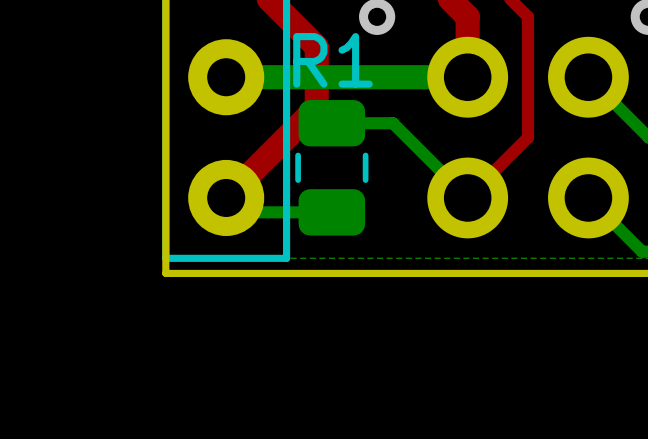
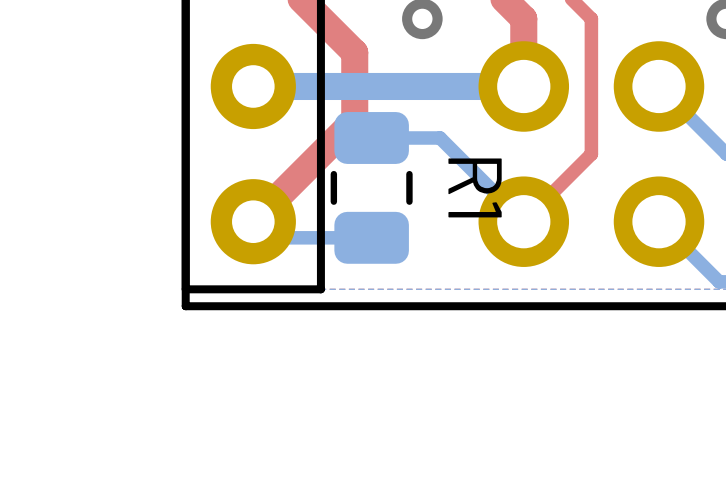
R1 name rotation: 0° (332, 60) -> 90° clockwise (475, 187)
R1 name position: R1 (332, 60) -> R1 (475, 187)

